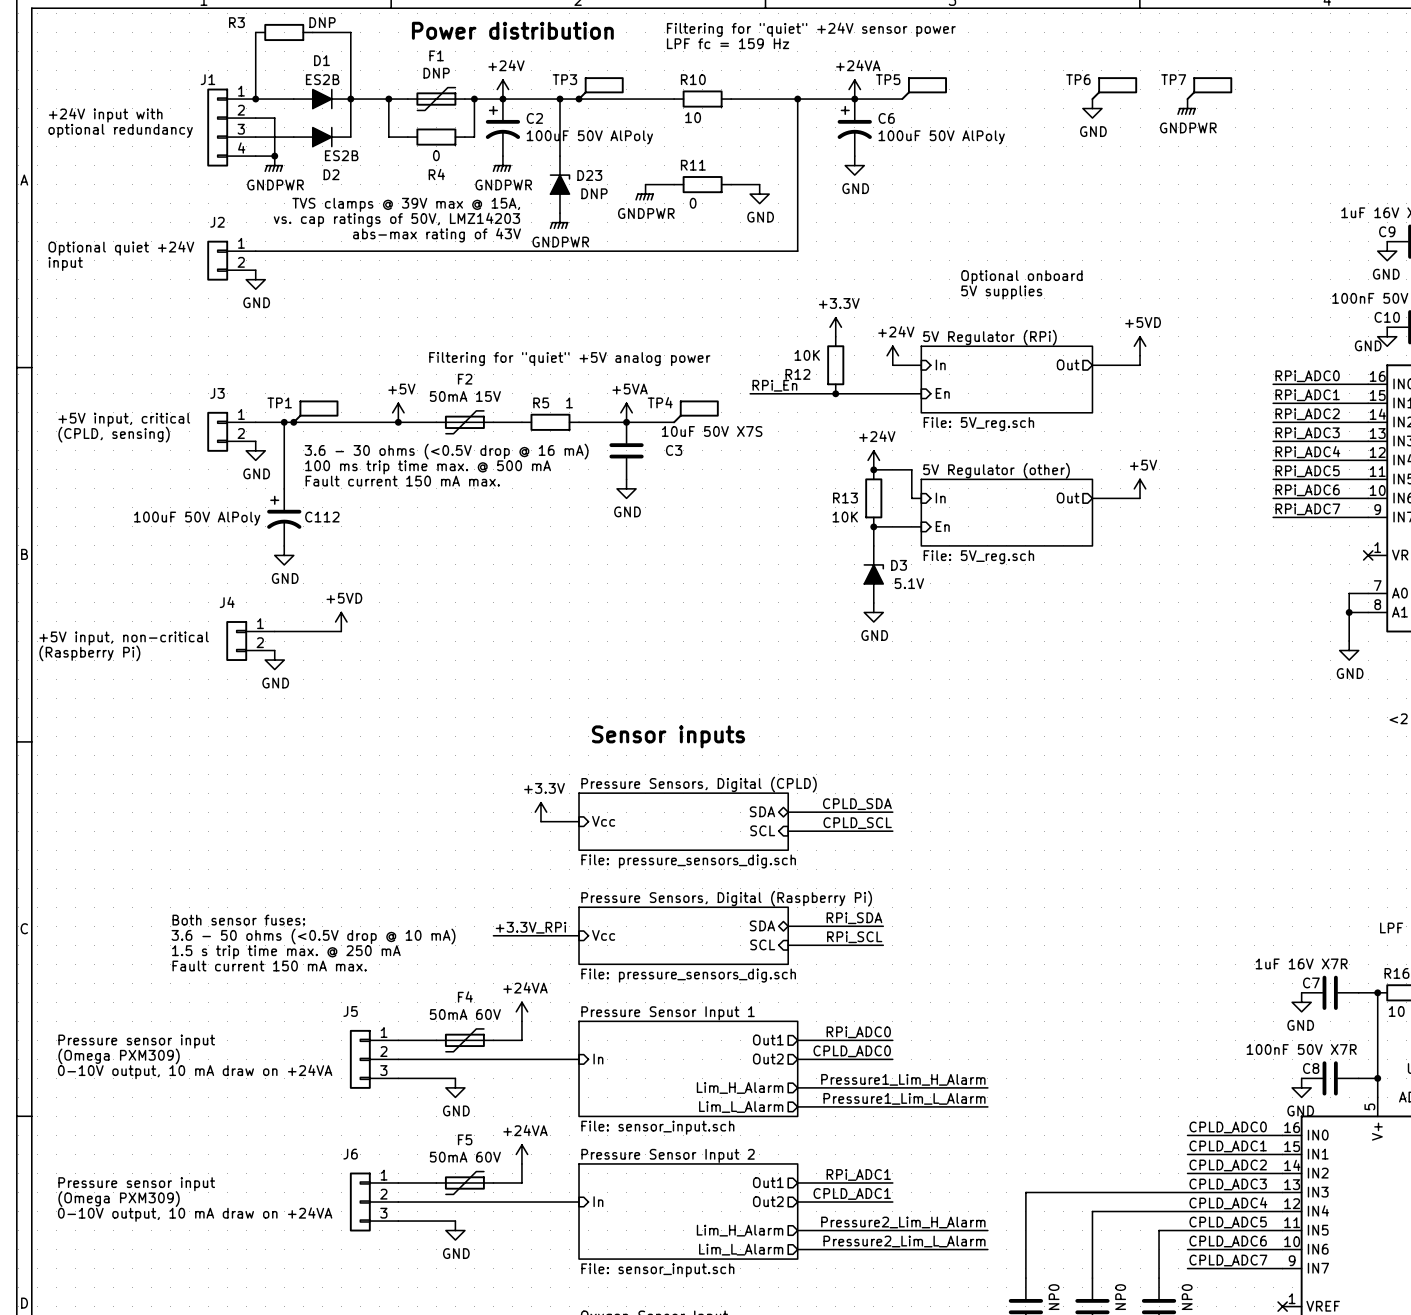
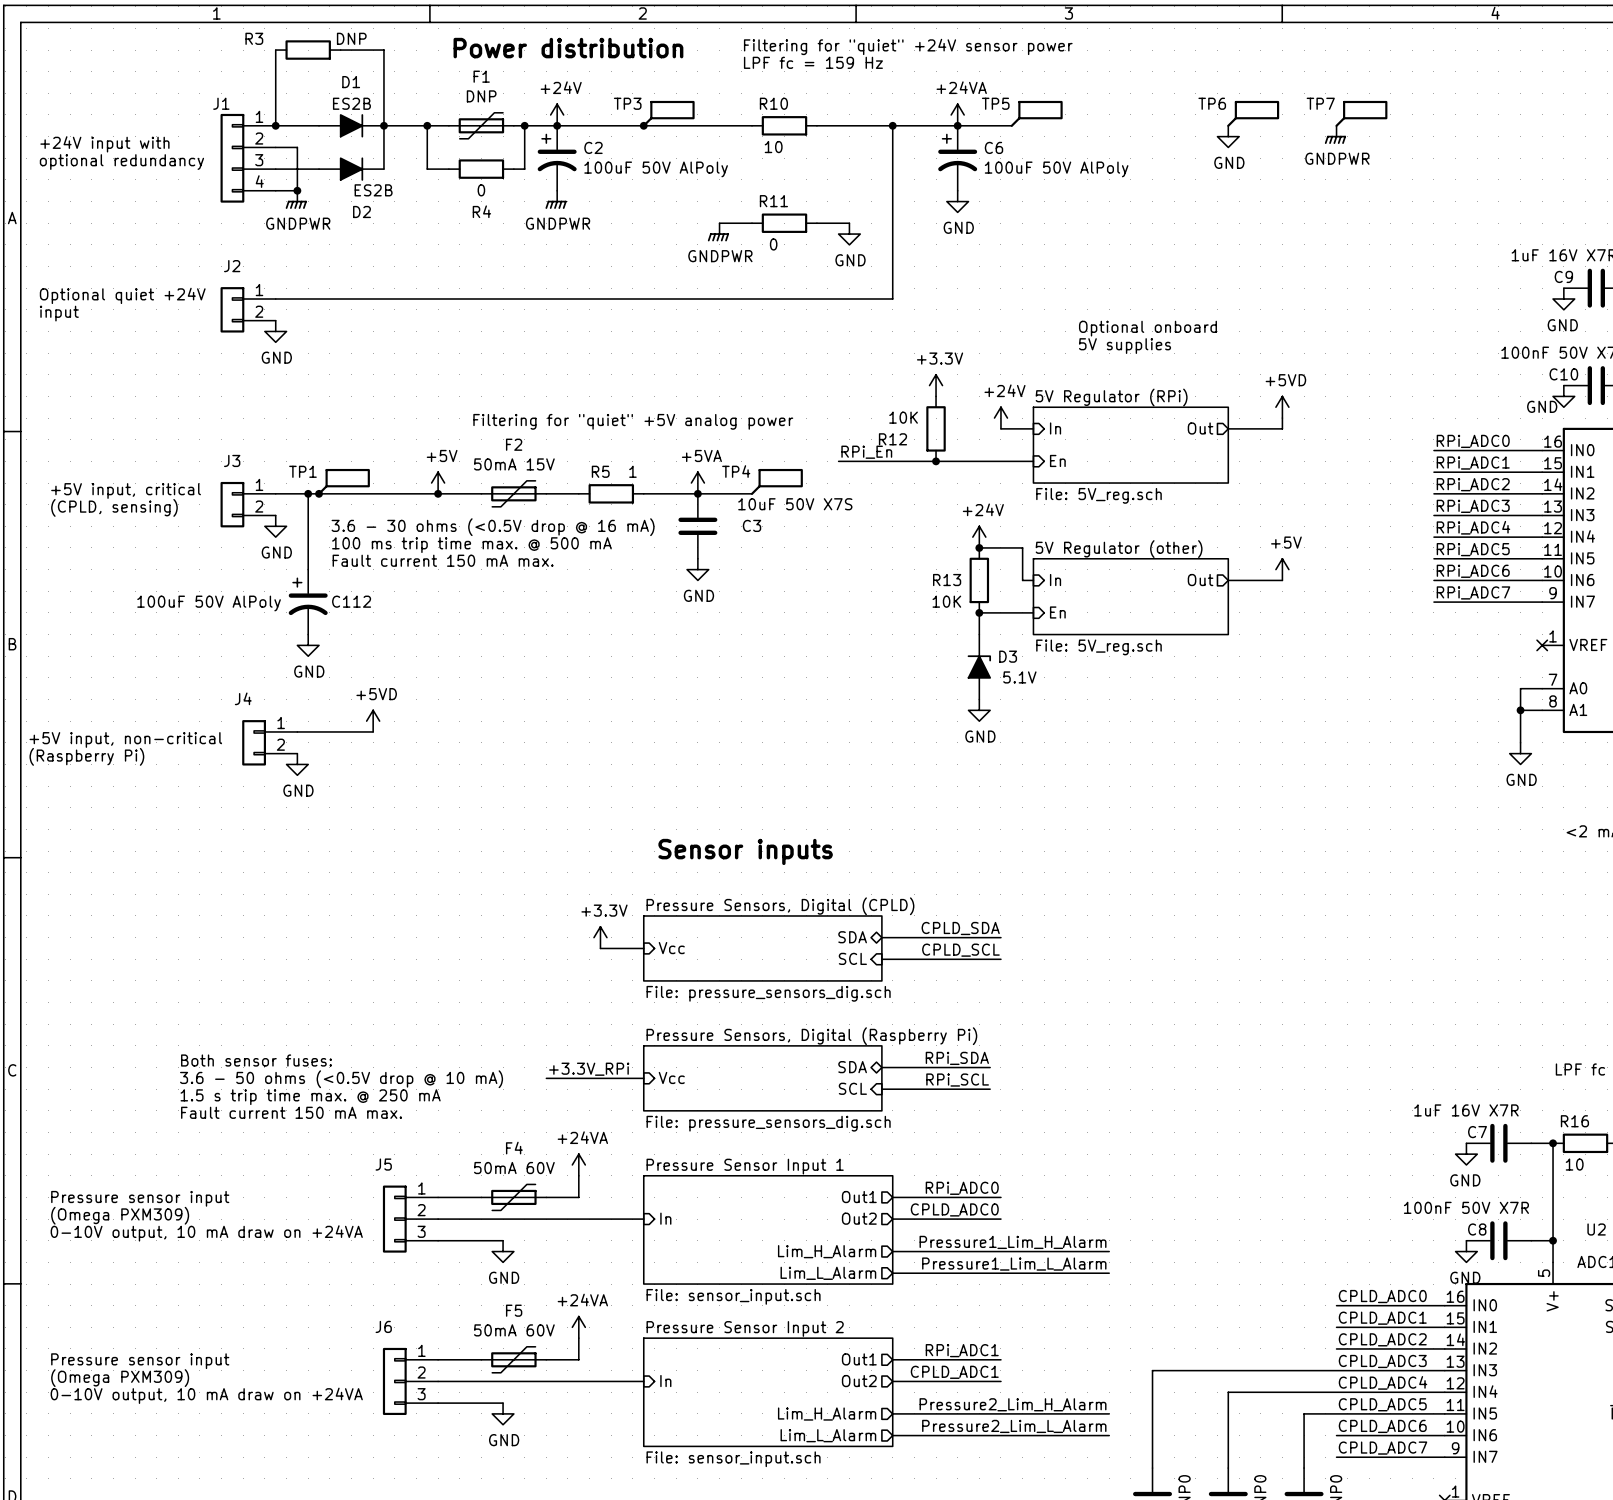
wire: (559, 99) (559, 156) -> none
junction: (559, 99) -> none
D23: DNP (559, 184) -> none
text: TVS clamps @ 39V max @ 15A, (406, 204) -> none
text: vs. cap ratings of 50V, LMZ14203 (396, 219) -> none
power symbol: GNDPWR (559, 221) -> none
text: abs-max rating of 43V (436, 235) -> none

